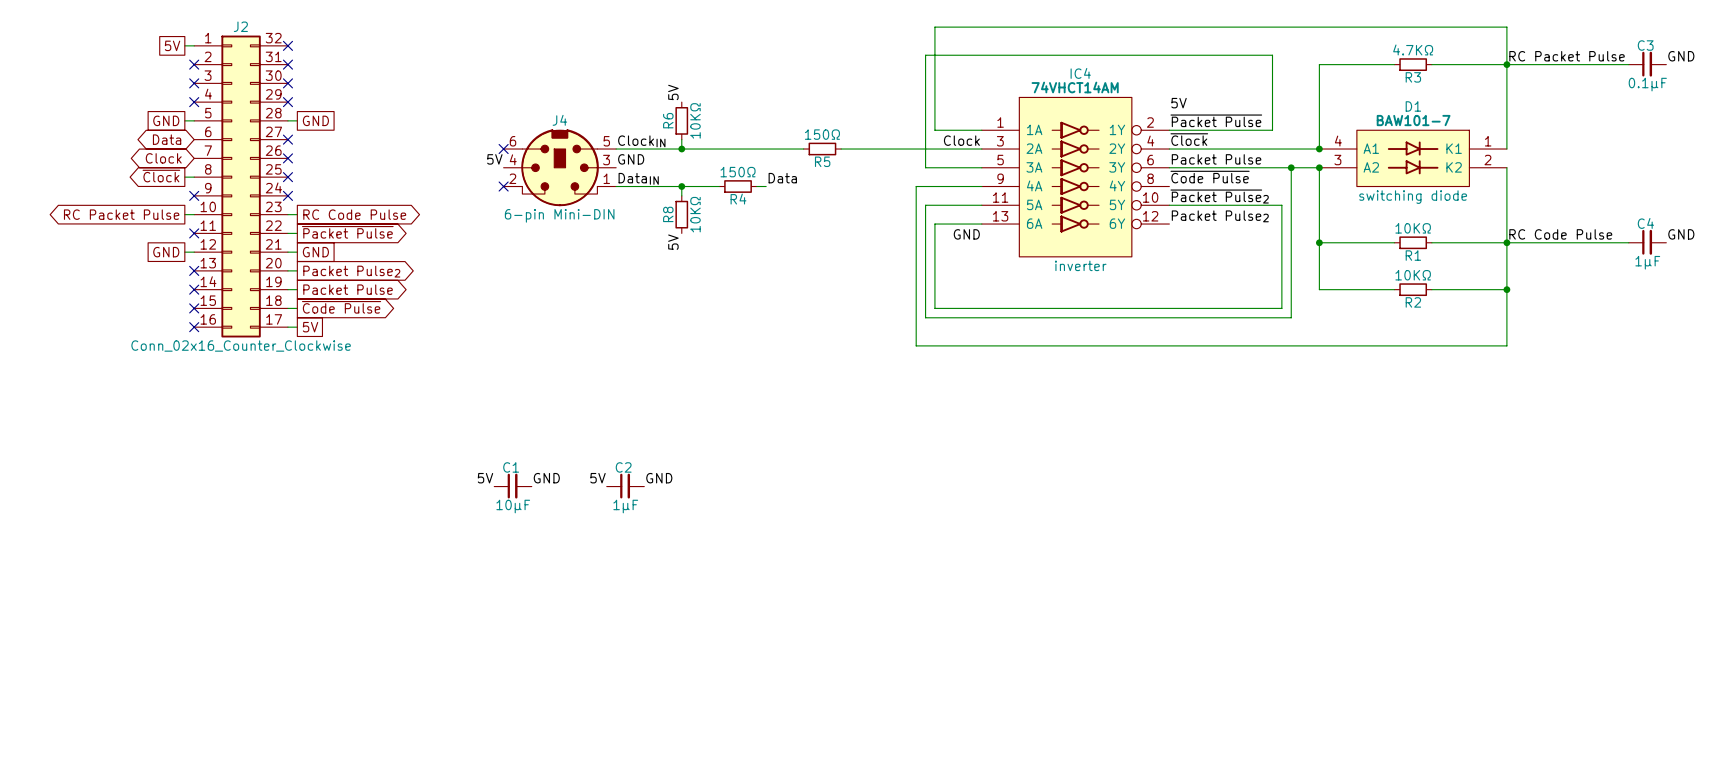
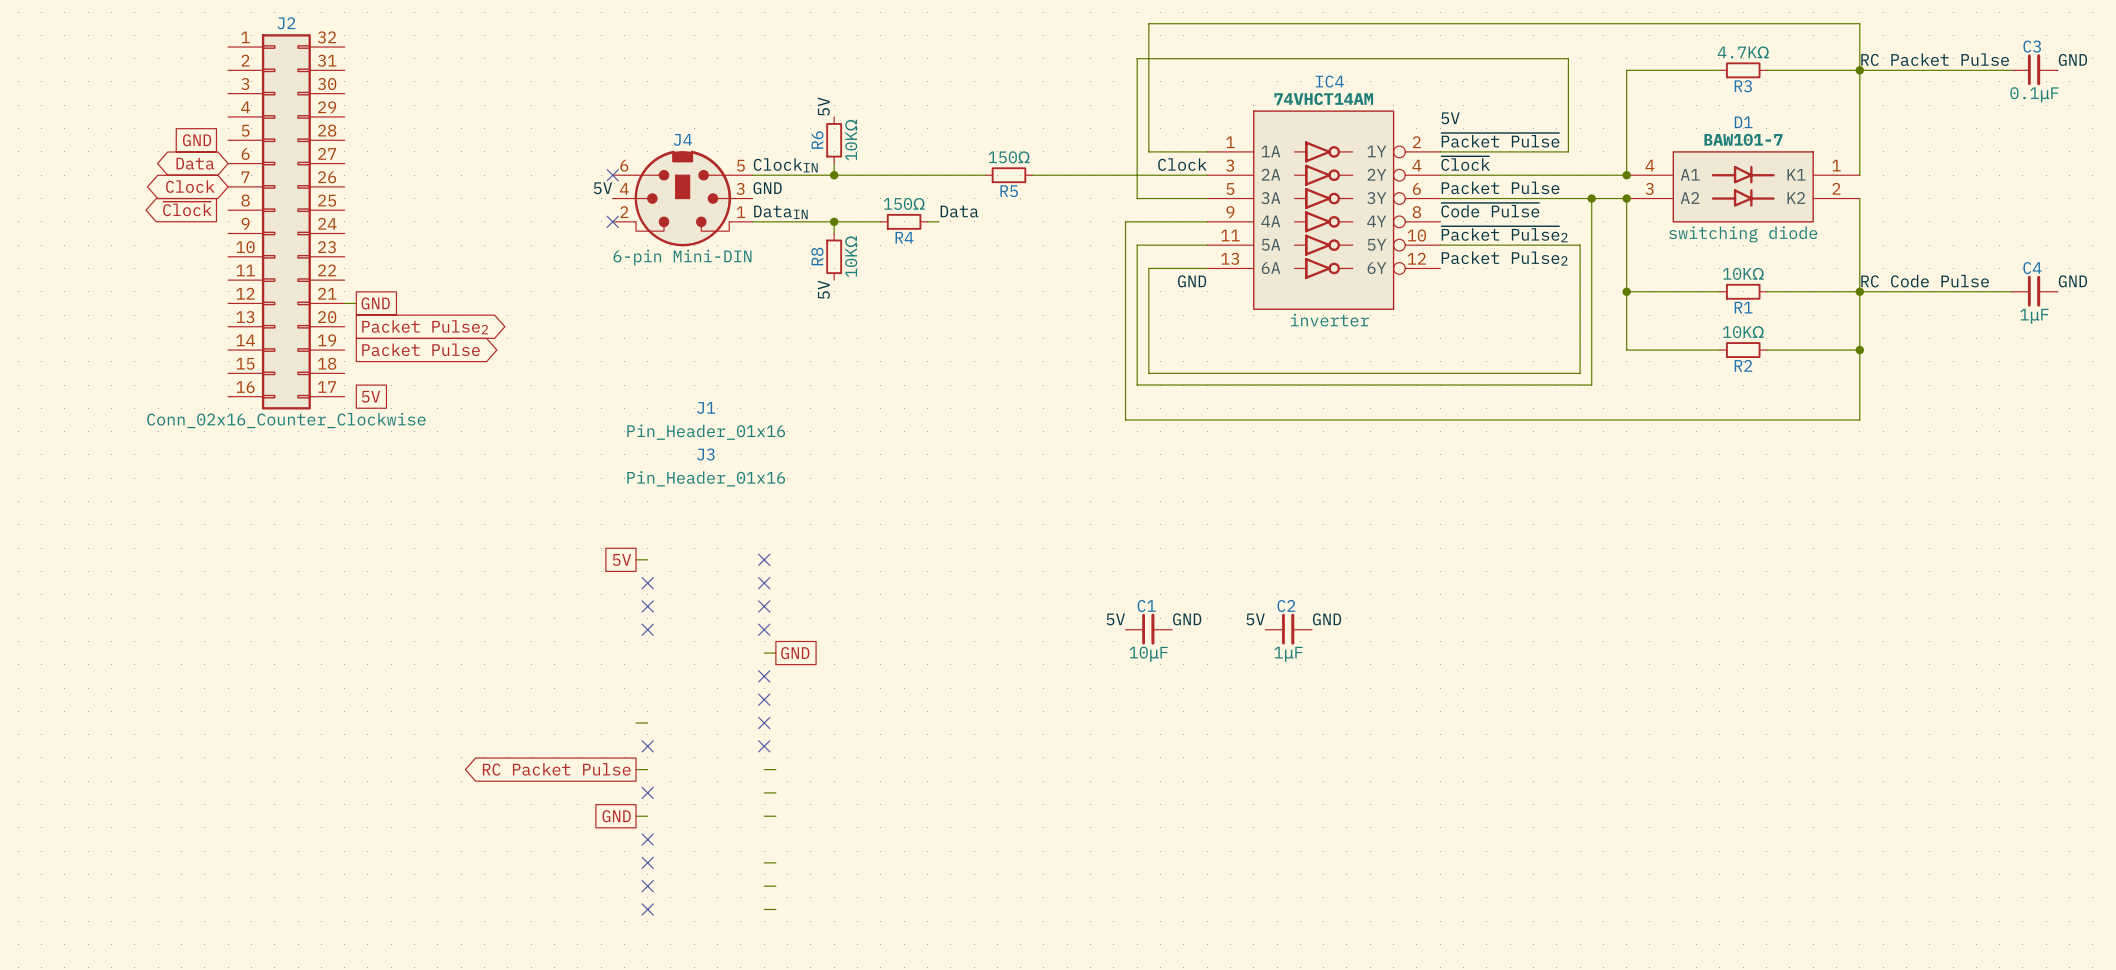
global label: 5V (172, 45) -> none
wire: (184, 45) (194, 45) -> none
no-connect mark: (287, 45) -> none
no-connect mark: (194, 64) -> none
no-connect mark: (287, 64) -> none
no-connect mark: (194, 83) -> none
no-connect mark: (287, 83) -> none
no-connect mark: (194, 102) -> none
no-connect mark: (287, 102) -> none
wire: (184, 120) (194, 120) -> none
wire: (287, 120) (297, 120) -> none
global label: GND (315, 120) -> none
no-connect mark: (287, 139) -> none
no-connect mark: (287, 158) -> none
wire: (184, 177) (194, 177) -> none
no-connect mark: (287, 177) -> none
no-connect mark: (194, 195) -> none
no-connect mark: (287, 195) -> none
global label: RC Packet Pulse (121, 214) -> none
wire: (184, 214) (194, 214) -> none
wire: (287, 214) (297, 214) -> none
global label: RC Code Pulse (354, 214) -> none
global label: ~{Packet Pulse} (347, 232) -> none
no-connect mark: (194, 233) -> none
wire: (287, 233) (297, 233) -> none
global label: GND (166, 252) -> none
wire: (184, 252) (194, 252) -> none
no-connect mark: (194, 270) -> none
wire: (287, 270) (297, 270) -> none
no-connect mark: (194, 289) -> none
wire: (287, 289) (297, 289) -> none
global label: ~{Code Pulse} (341, 307) -> none
no-connect mark: (194, 308) -> none
wire: (287, 308) (297, 308) -> none
no-connect mark: (194, 327) -> none
wire: (287, 327) (297, 327) -> none
J1: none -> Pin_Header_01x16 (706, 420)
J3: none -> Pin_Header_01x16 (706, 467)
global label: none -> 5V (621, 559)
wire: none -> (636, 559) (647, 559)
no-connect mark: none -> (764, 559)
no-connect mark: none -> (647, 583)
no-connect mark: none -> (764, 583)
label: 5V (485, 478) -> none
label: GND (546, 478) -> none
label: 5V (597, 478) -> none
label: GND (659, 478) -> none
C1 position: (513, 486) -> (1148, 629)
C2 position: (625, 486) -> (1288, 629)
no-connect mark: none -> (647, 606)
no-connect mark: none -> (764, 606)
label: none -> 5V (1115, 619)
label: none -> GND (1187, 619)
label: none -> 5V (1255, 619)
label: none -> GND (1327, 619)
no-connect mark: none -> (647, 629)
no-connect mark: none -> (764, 629)
wire: none -> (764, 653) (775, 653)
global label: none -> GND (795, 653)
no-connect mark: none -> (764, 676)
no-connect mark: none -> (764, 699)
wire: none -> (636, 722) (647, 722)
no-connect mark: none -> (764, 722)
no-connect mark: none -> (647, 746)
no-connect mark: none -> (764, 746)
global label: none -> RC Packet Pulse (556, 769)
wire: none -> (636, 769) (647, 769)
wire: none -> (764, 769) (775, 769)
no-connect mark: none -> (647, 792)
wire: none -> (764, 792) (775, 792)
global label: none -> GND (616, 816)
wire: none -> (636, 816) (647, 816)
wire: none -> (764, 816) (775, 816)
no-connect mark: none -> (647, 839)
no-connect mark: none -> (647, 862)
wire: none -> (764, 862) (775, 862)
no-connect mark: none -> (647, 886)
wire: none -> (764, 886) (775, 886)
no-connect mark: none -> (647, 909)
wire: none -> (764, 909) (775, 909)

